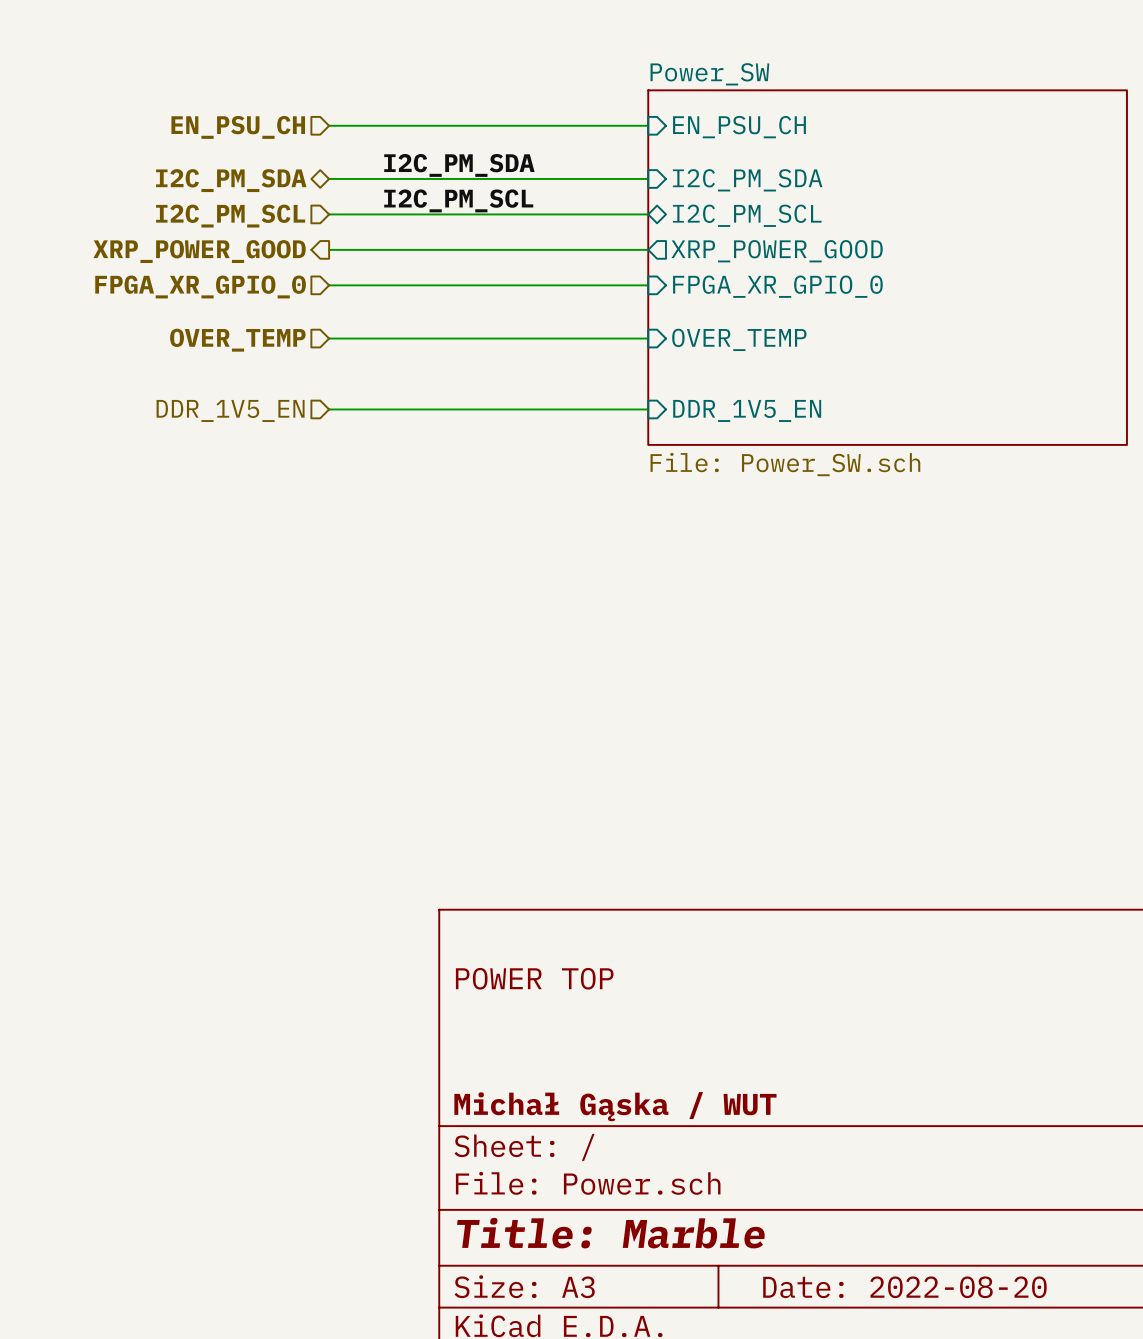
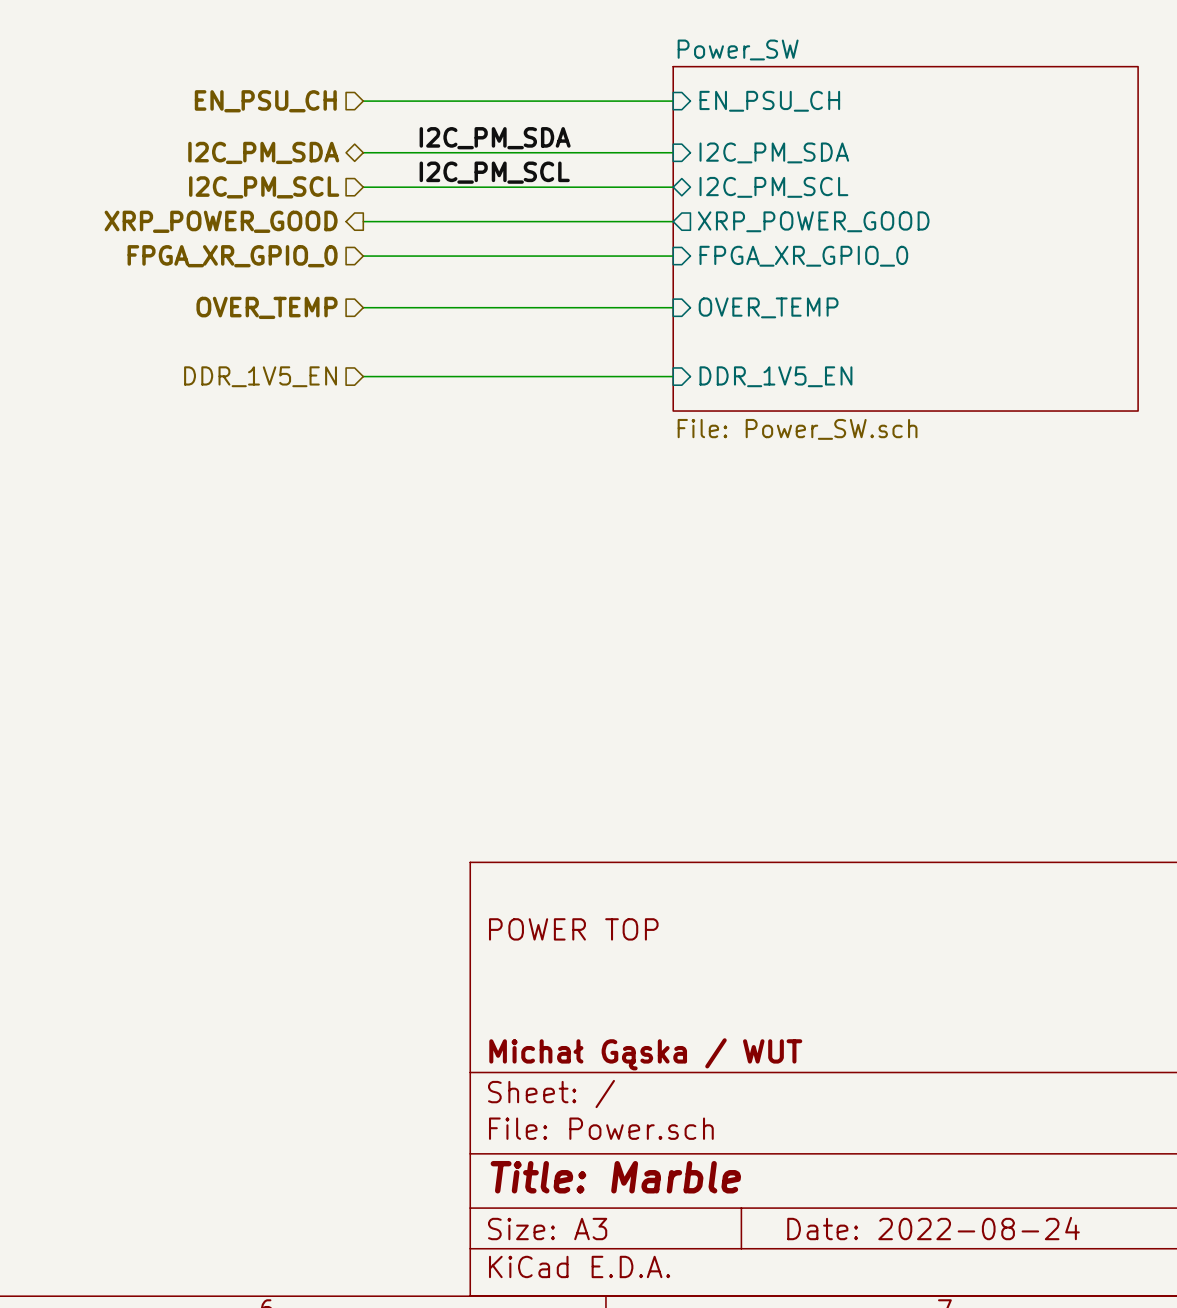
title block: Date: 2022-08-20 (904, 1287) -> Date: 2022-08-24 (933, 1228)

